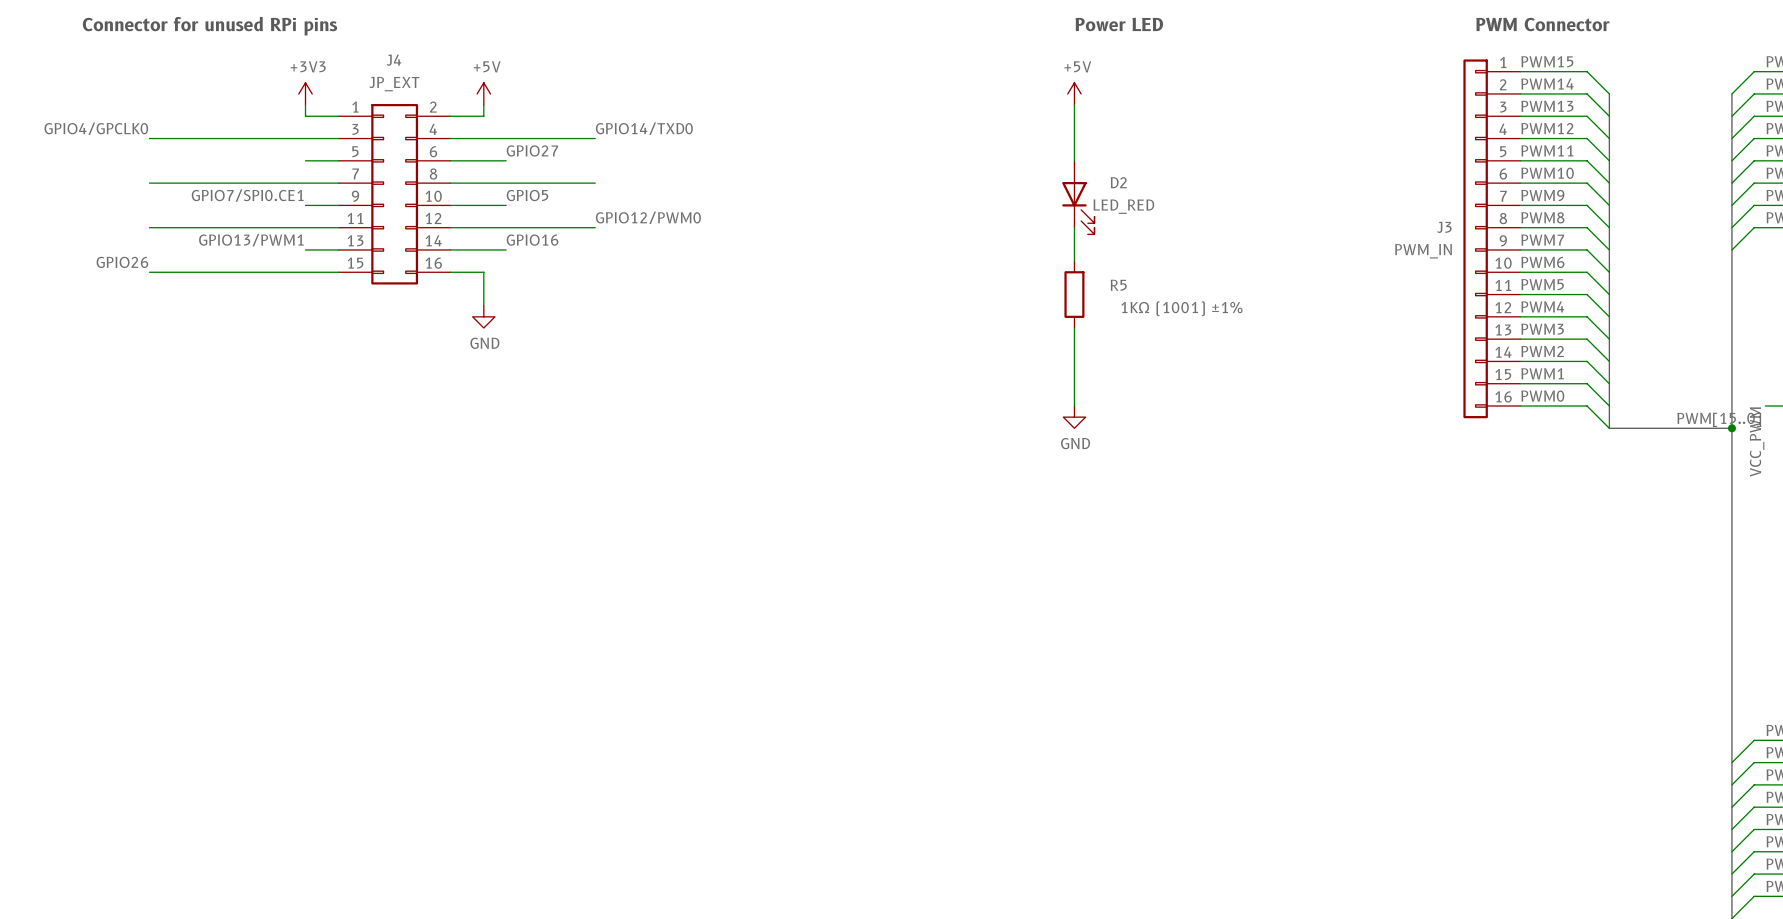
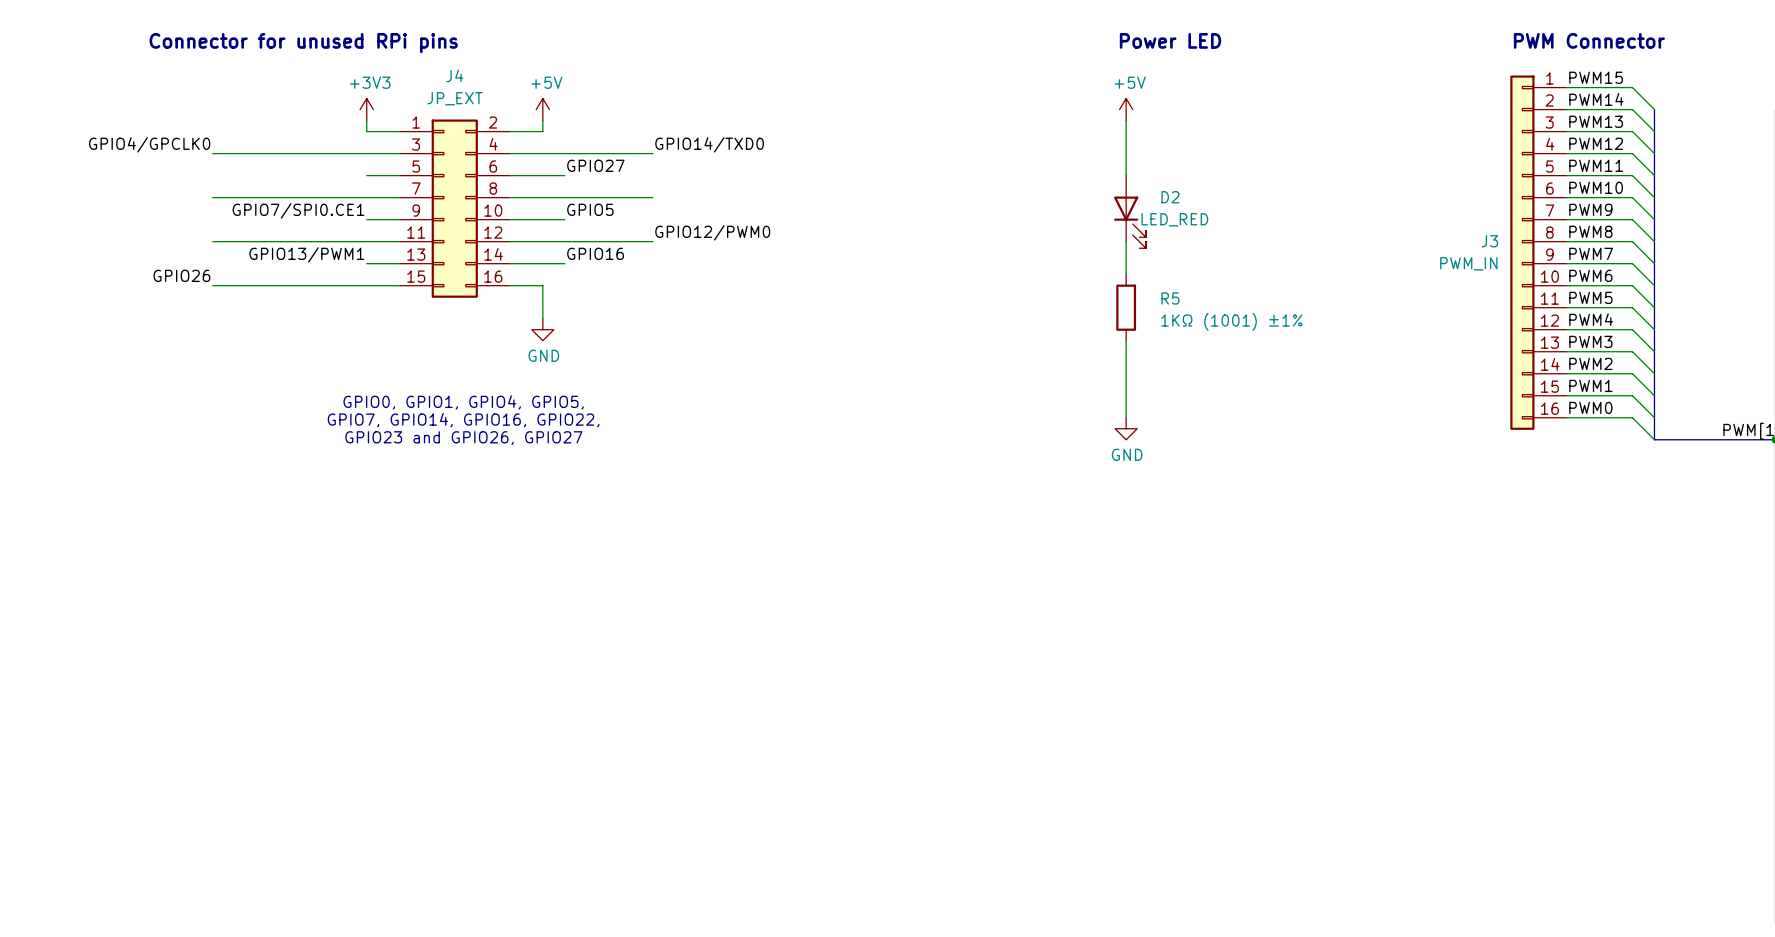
text: none -> GPIO0, GPIO1, GPIO4, GPIO5, (463, 402)
text: none -> GPIO7, GPIO14, GPIO16, GPIO22, (463, 420)
text: none -> GPIO23 and GPIO26, GPIO27 (463, 438)

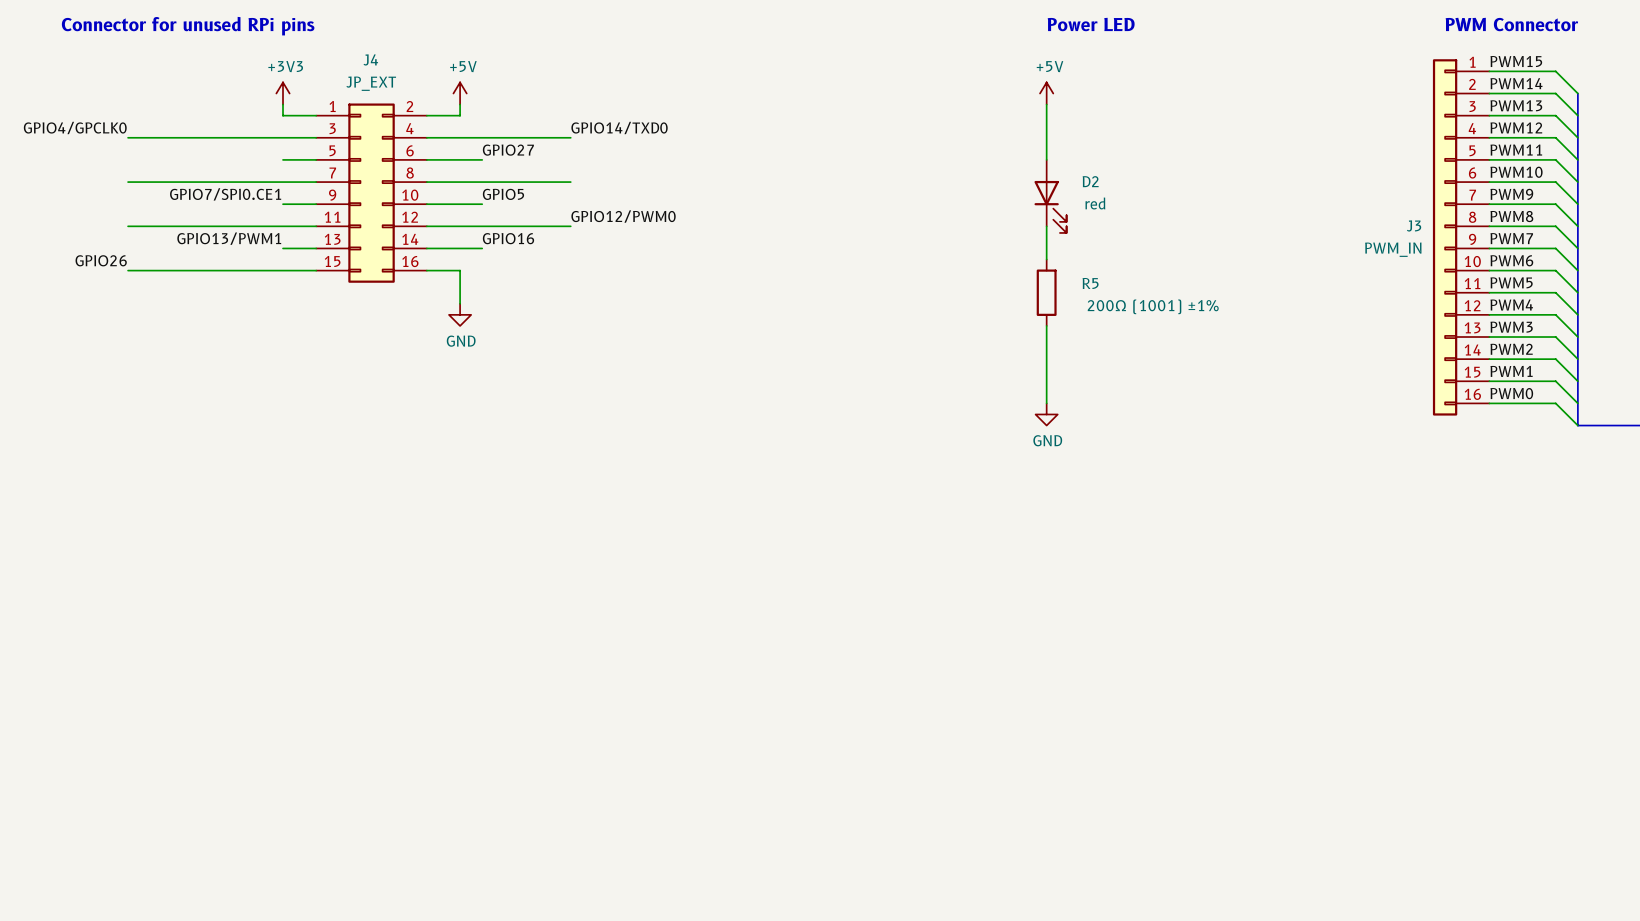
D2 value: LED_RED (1174, 219) -> red (1095, 203)
R5 value: 1KΩ (1001) ±1% (1231, 321) -> 200Ω (1001) ±1% (1153, 306)
text: GPIO0, GPIO1, GPIO4, GPIO5, (463, 402) -> none
text: GPIO7, GPIO14, GPIO16, GPIO22, (463, 420) -> none
text: GPIO23 and GPIO26, GPIO27 (463, 438) -> none

